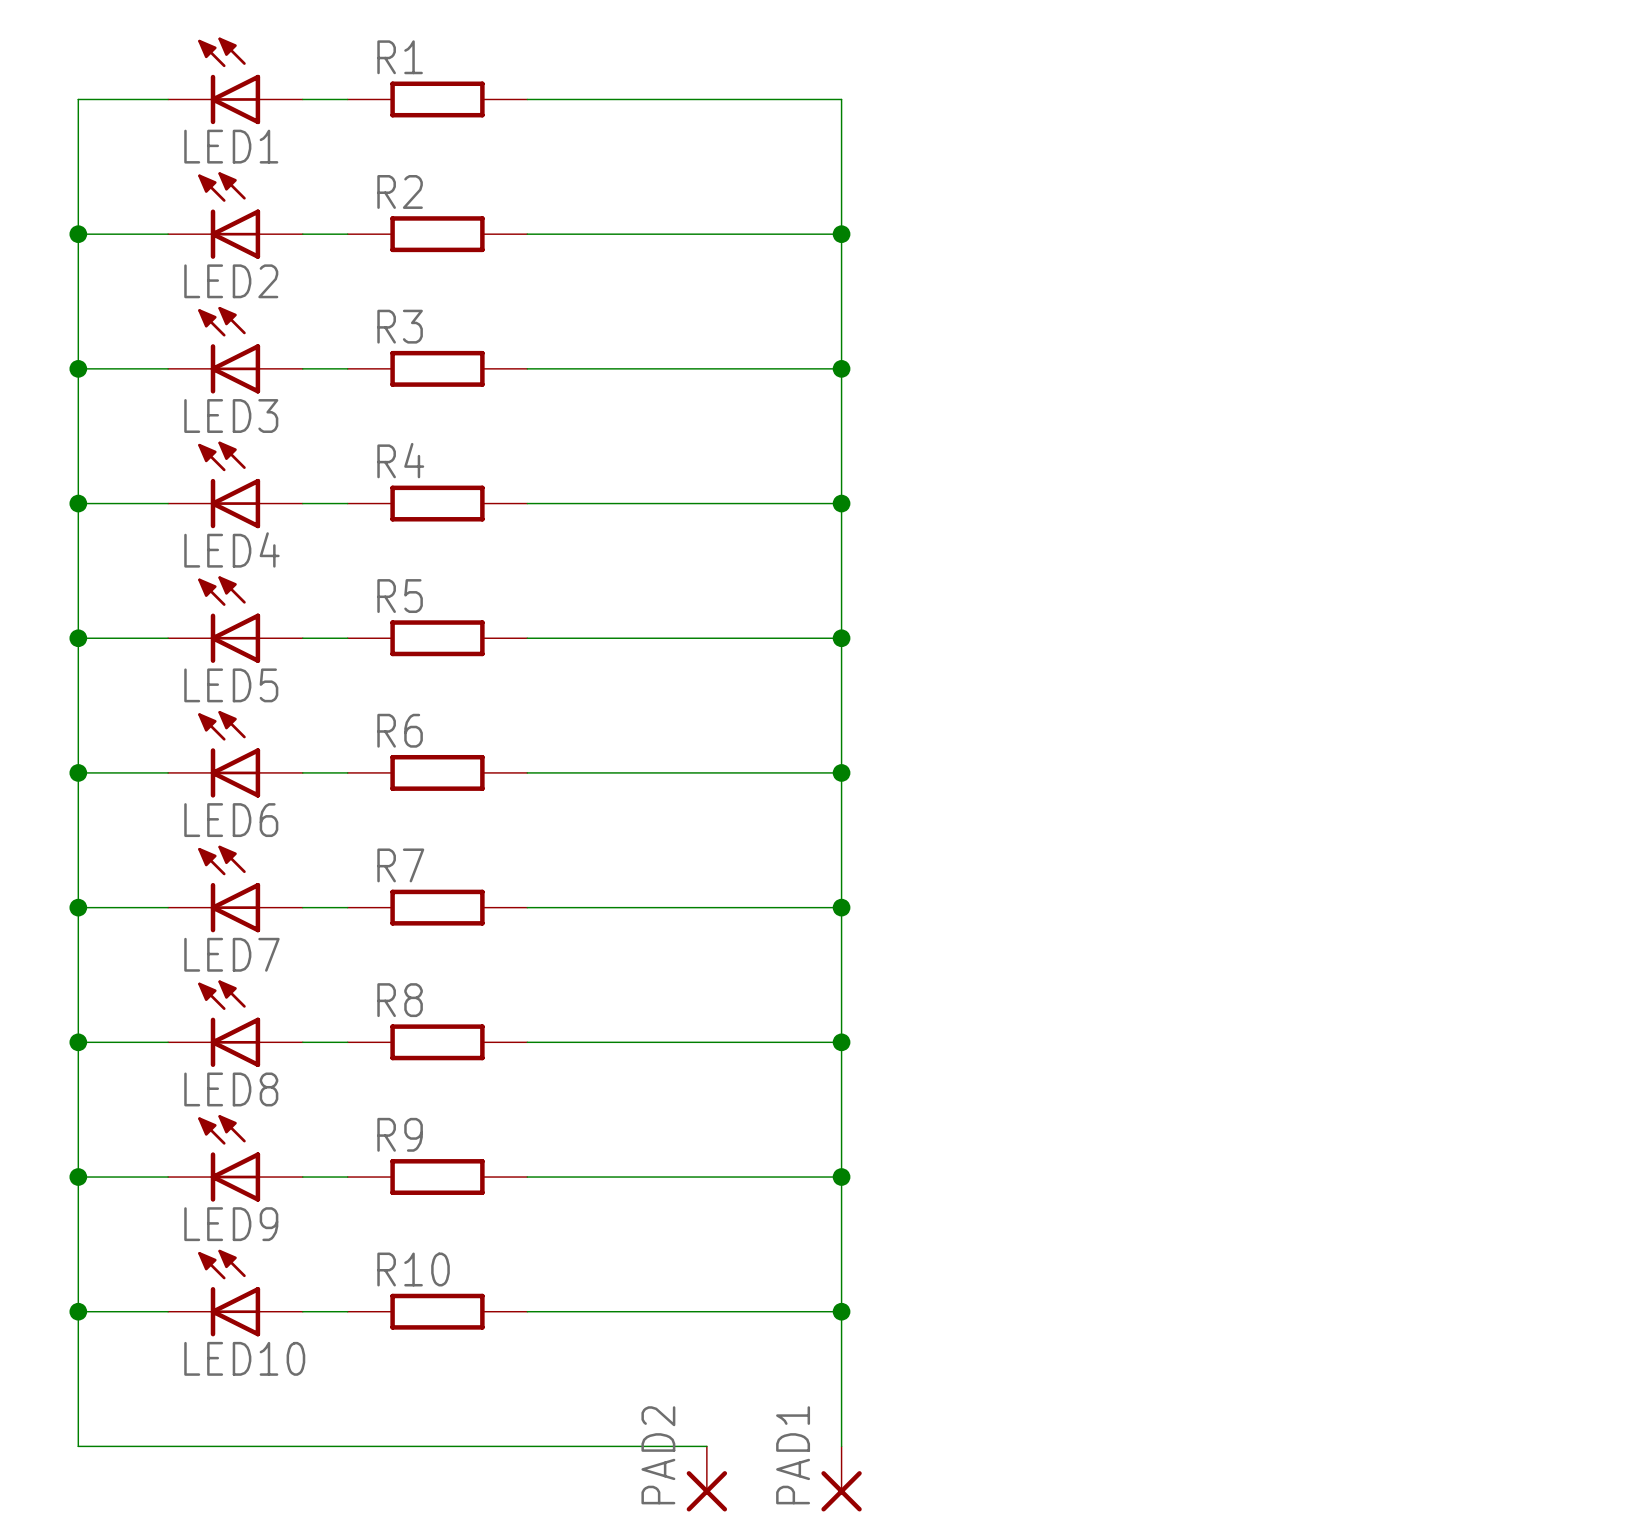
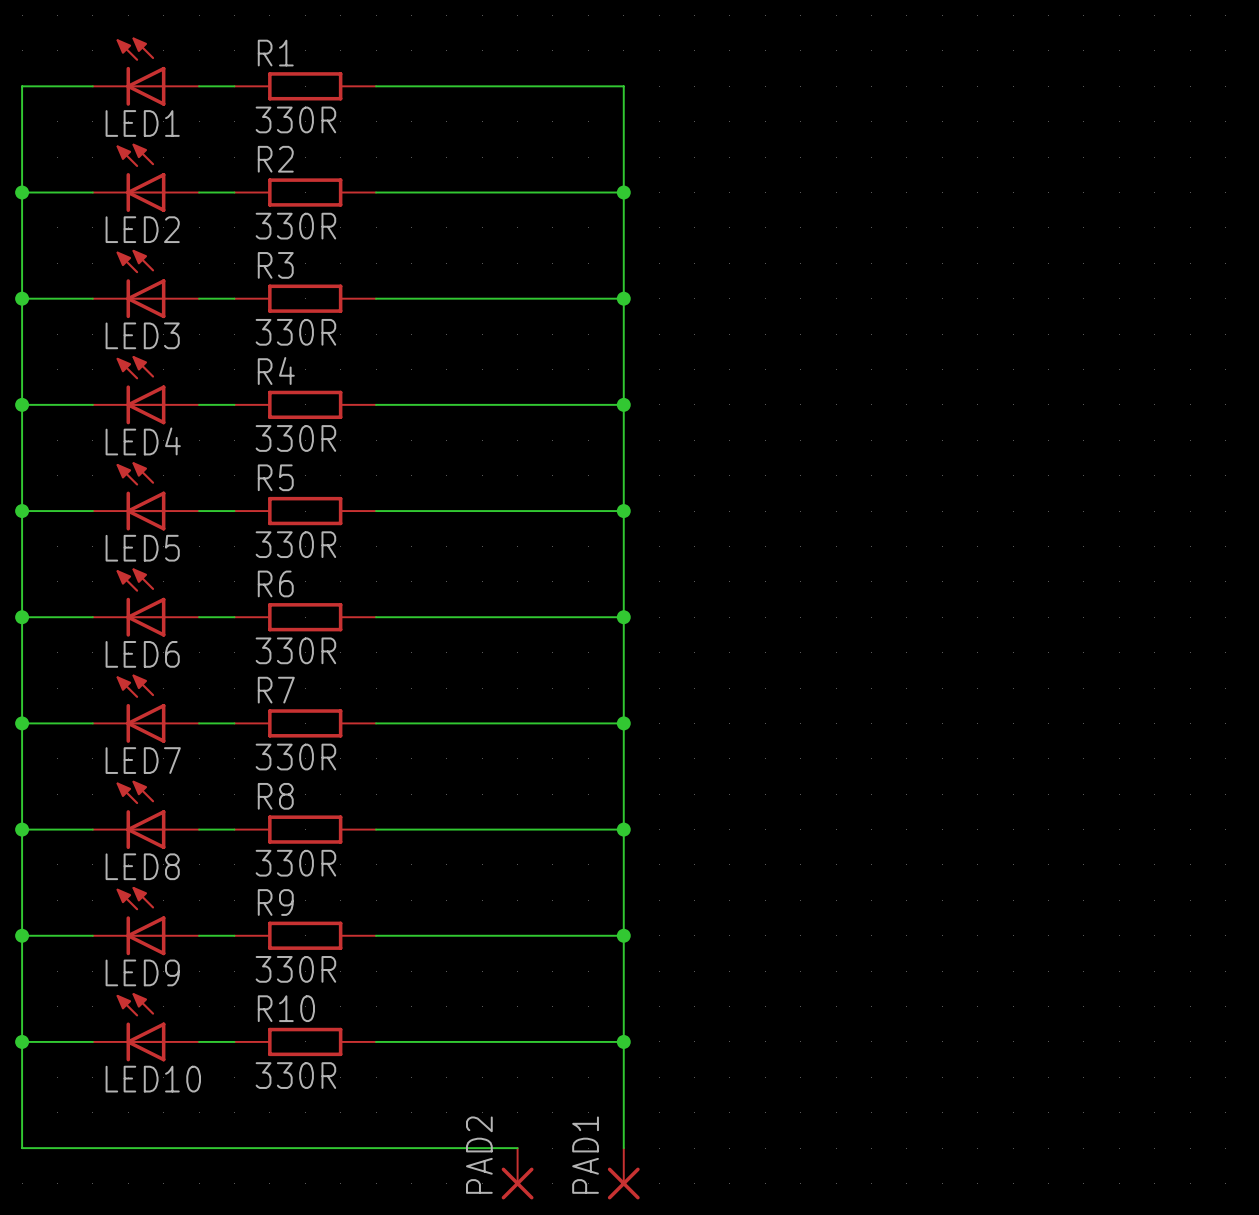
R1 value: none -> 330R (295, 119)
R2 value: none -> 330R (295, 226)
R3 value: none -> 330R (295, 332)
R4 value: none -> 330R (295, 438)
R5 value: none -> 330R (295, 544)
R6 value: none -> 330R (295, 650)
R7 value: none -> 330R (295, 757)
R8 value: none -> 330R (295, 863)
R9 value: none -> 330R (295, 969)
R10 value: none -> 330R (295, 1075)

